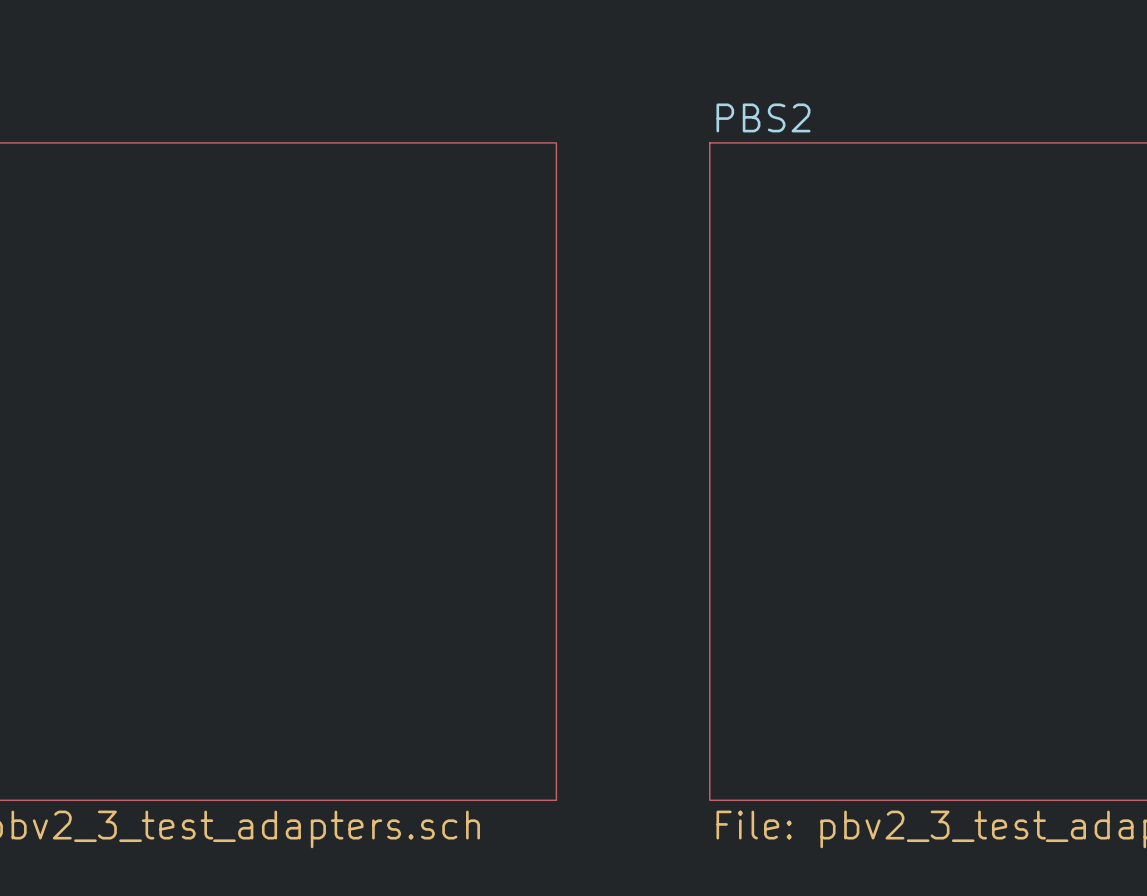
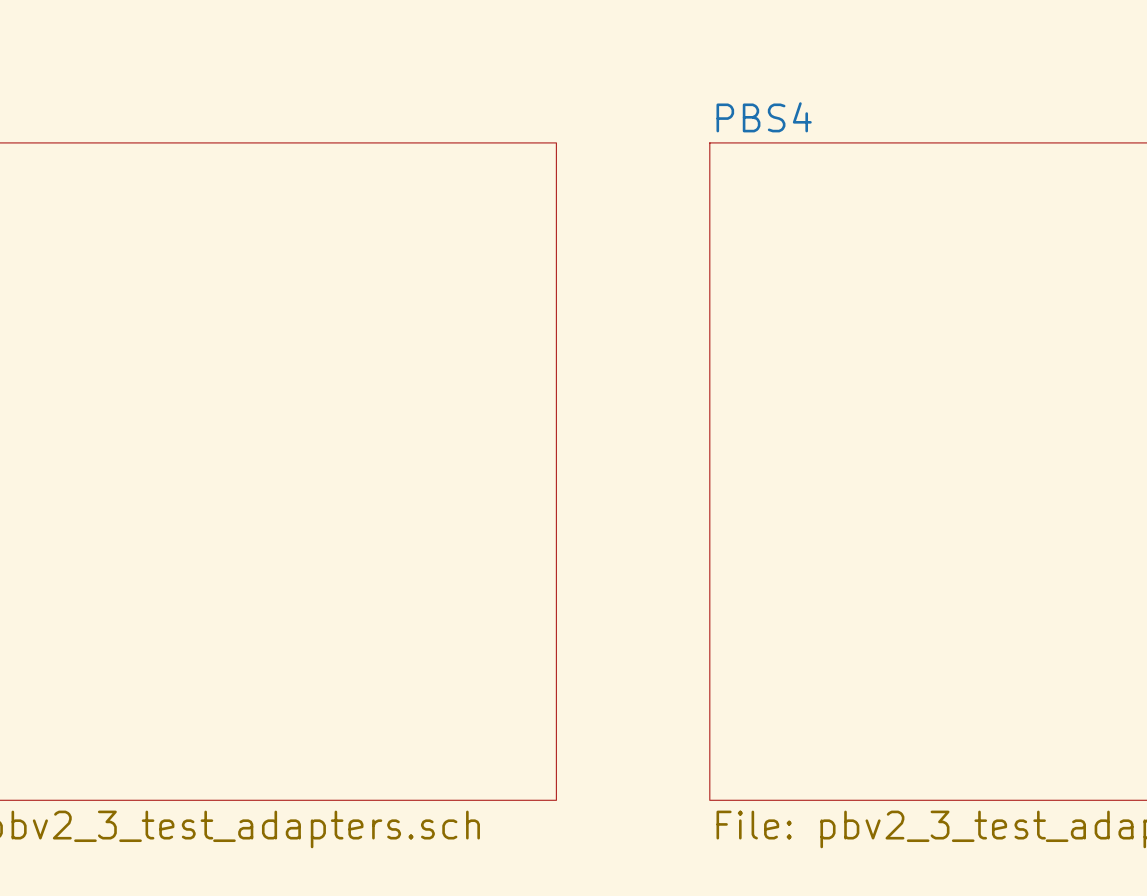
sheet PBS2 name: PBS2 (763, 117) -> PBS4 (764, 117)

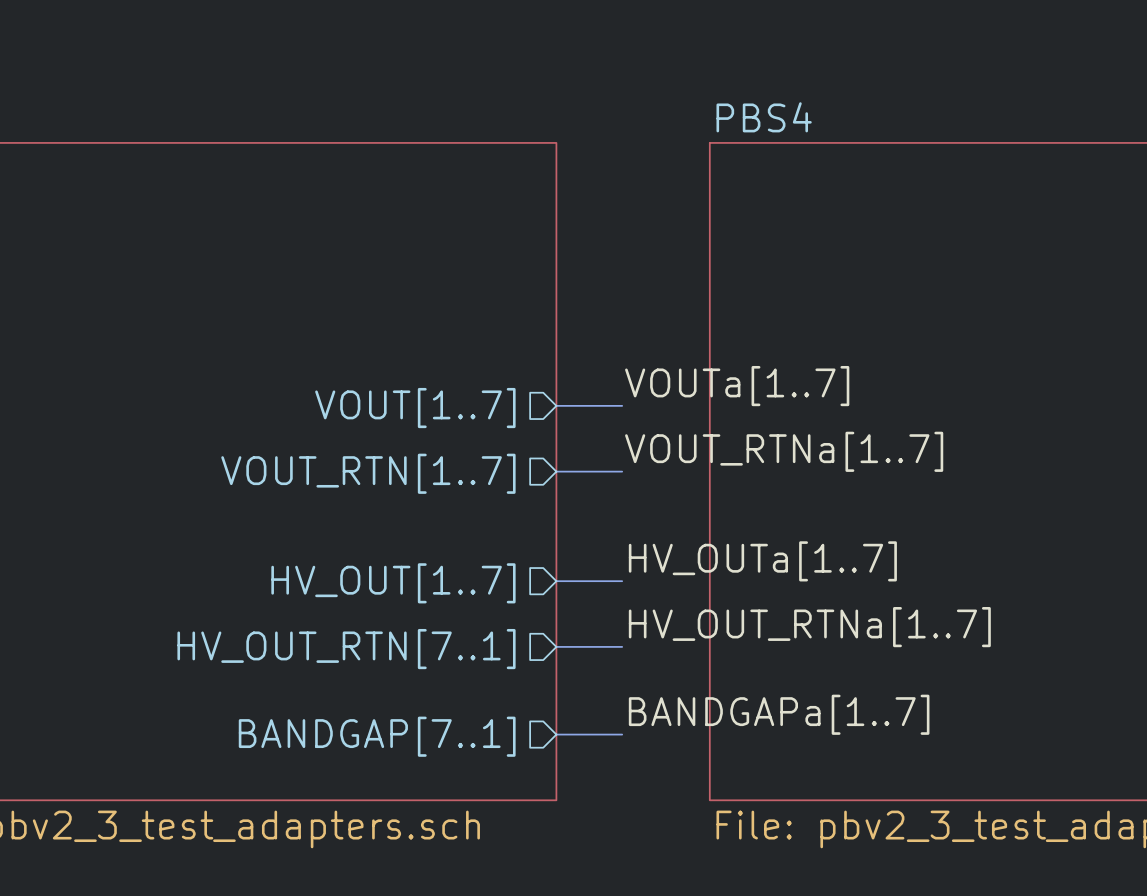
label: none -> VOUTa[1..7] (737, 386)
bus: none -> (556, 405) (622, 405)
sheet pin: none -> VOUT[1..7] (415, 408)
label: none -> VOUT_RTNa[1..7] (784, 451)
bus: none -> (556, 471) (622, 471)
sheet pin: none -> VOUT_RTN[1..7] (368, 473)
label: none -> HV_OUTa[1..7] (762, 561)
bus: none -> (556, 581) (622, 581)
sheet pin: none -> HV_OUT[1..7] (393, 583)
label: none -> HV_OUT_RTNa[1..7] (809, 627)
bus: none -> (556, 646) (622, 646)
sheet pin: none -> HV_OUT_RTN[7..1] (346, 649)
label: none -> BANDGAPa[1..7] (779, 714)
bus: none -> (556, 734) (622, 734)
sheet pin: none -> BANDGAP[7..1] (377, 736)

